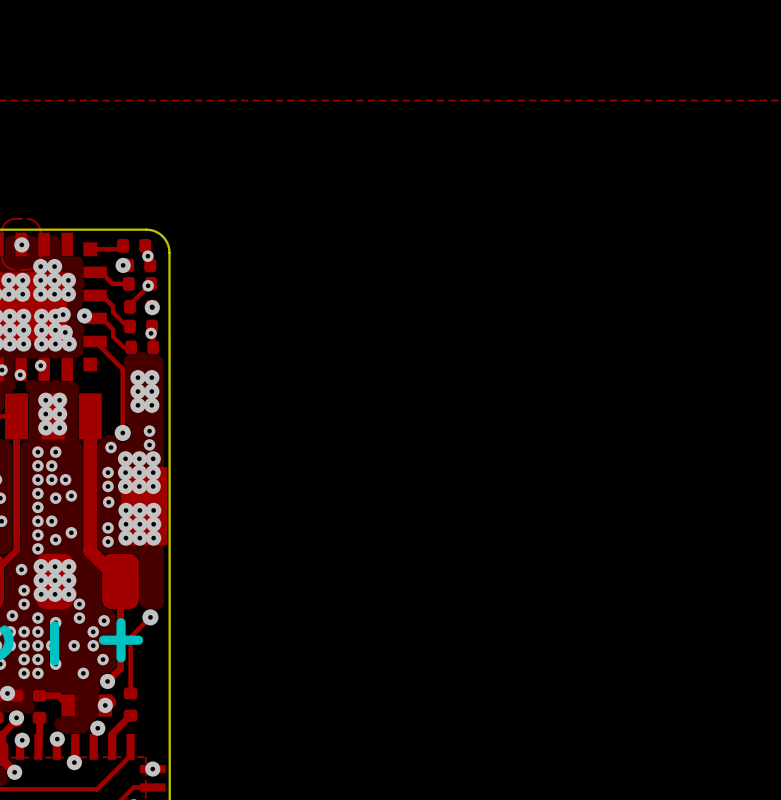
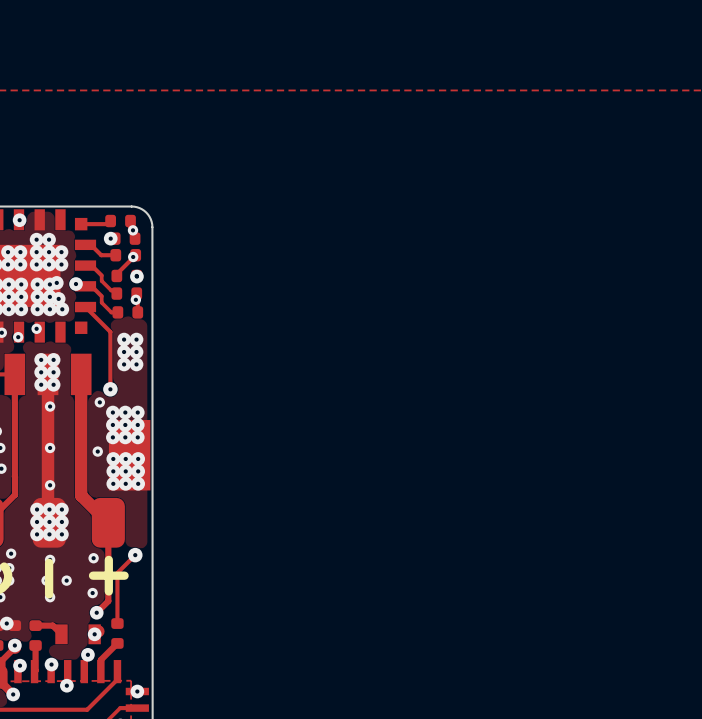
zone outline: (12, 219) (7, 221) (1, 229) (1, 259) (3, 263) (12, 269) (30, 269) (38, 263) (40, 259) (40, 229) (38, 224) (30, 219) (12, 219) -> none
track: none -> (48, 374) (49, 522)
via: (149, 431) -> none
via: (149, 444) -> none
via: (37, 452) -> none
via: (37, 465) -> none
via: (51, 465) -> none
via: (108, 472) -> none
via: (37, 479) -> none
via: (51, 479) -> none
via: (65, 479) -> none
via: (108, 486) -> none
via: (37, 493) -> none
via: (71, 495) -> none
via: (37, 507) -> none
via: (37, 521) -> none
via: (51, 521) -> none
via: (108, 527) -> none
via: (71, 532) -> none
via: (37, 535) -> none
via: (108, 541) -> none
via: (37, 548) -> none
via: (21, 569) -> none
via: (24, 590) -> none
via: (24, 604) -> none
via: (79, 604) -> none
via: (37, 618) -> none
via: (79, 618) -> none
via: (24, 631) -> none
via: (37, 631) -> none
via: (93, 631) -> none
via: (24, 645) -> none
via: (37, 645) -> none
via: (93, 645) -> none
via: (24, 659) -> none
via: (37, 659) -> none
via: (24, 673) -> none
via: (37, 673) -> none
via: (83, 673) -> none

